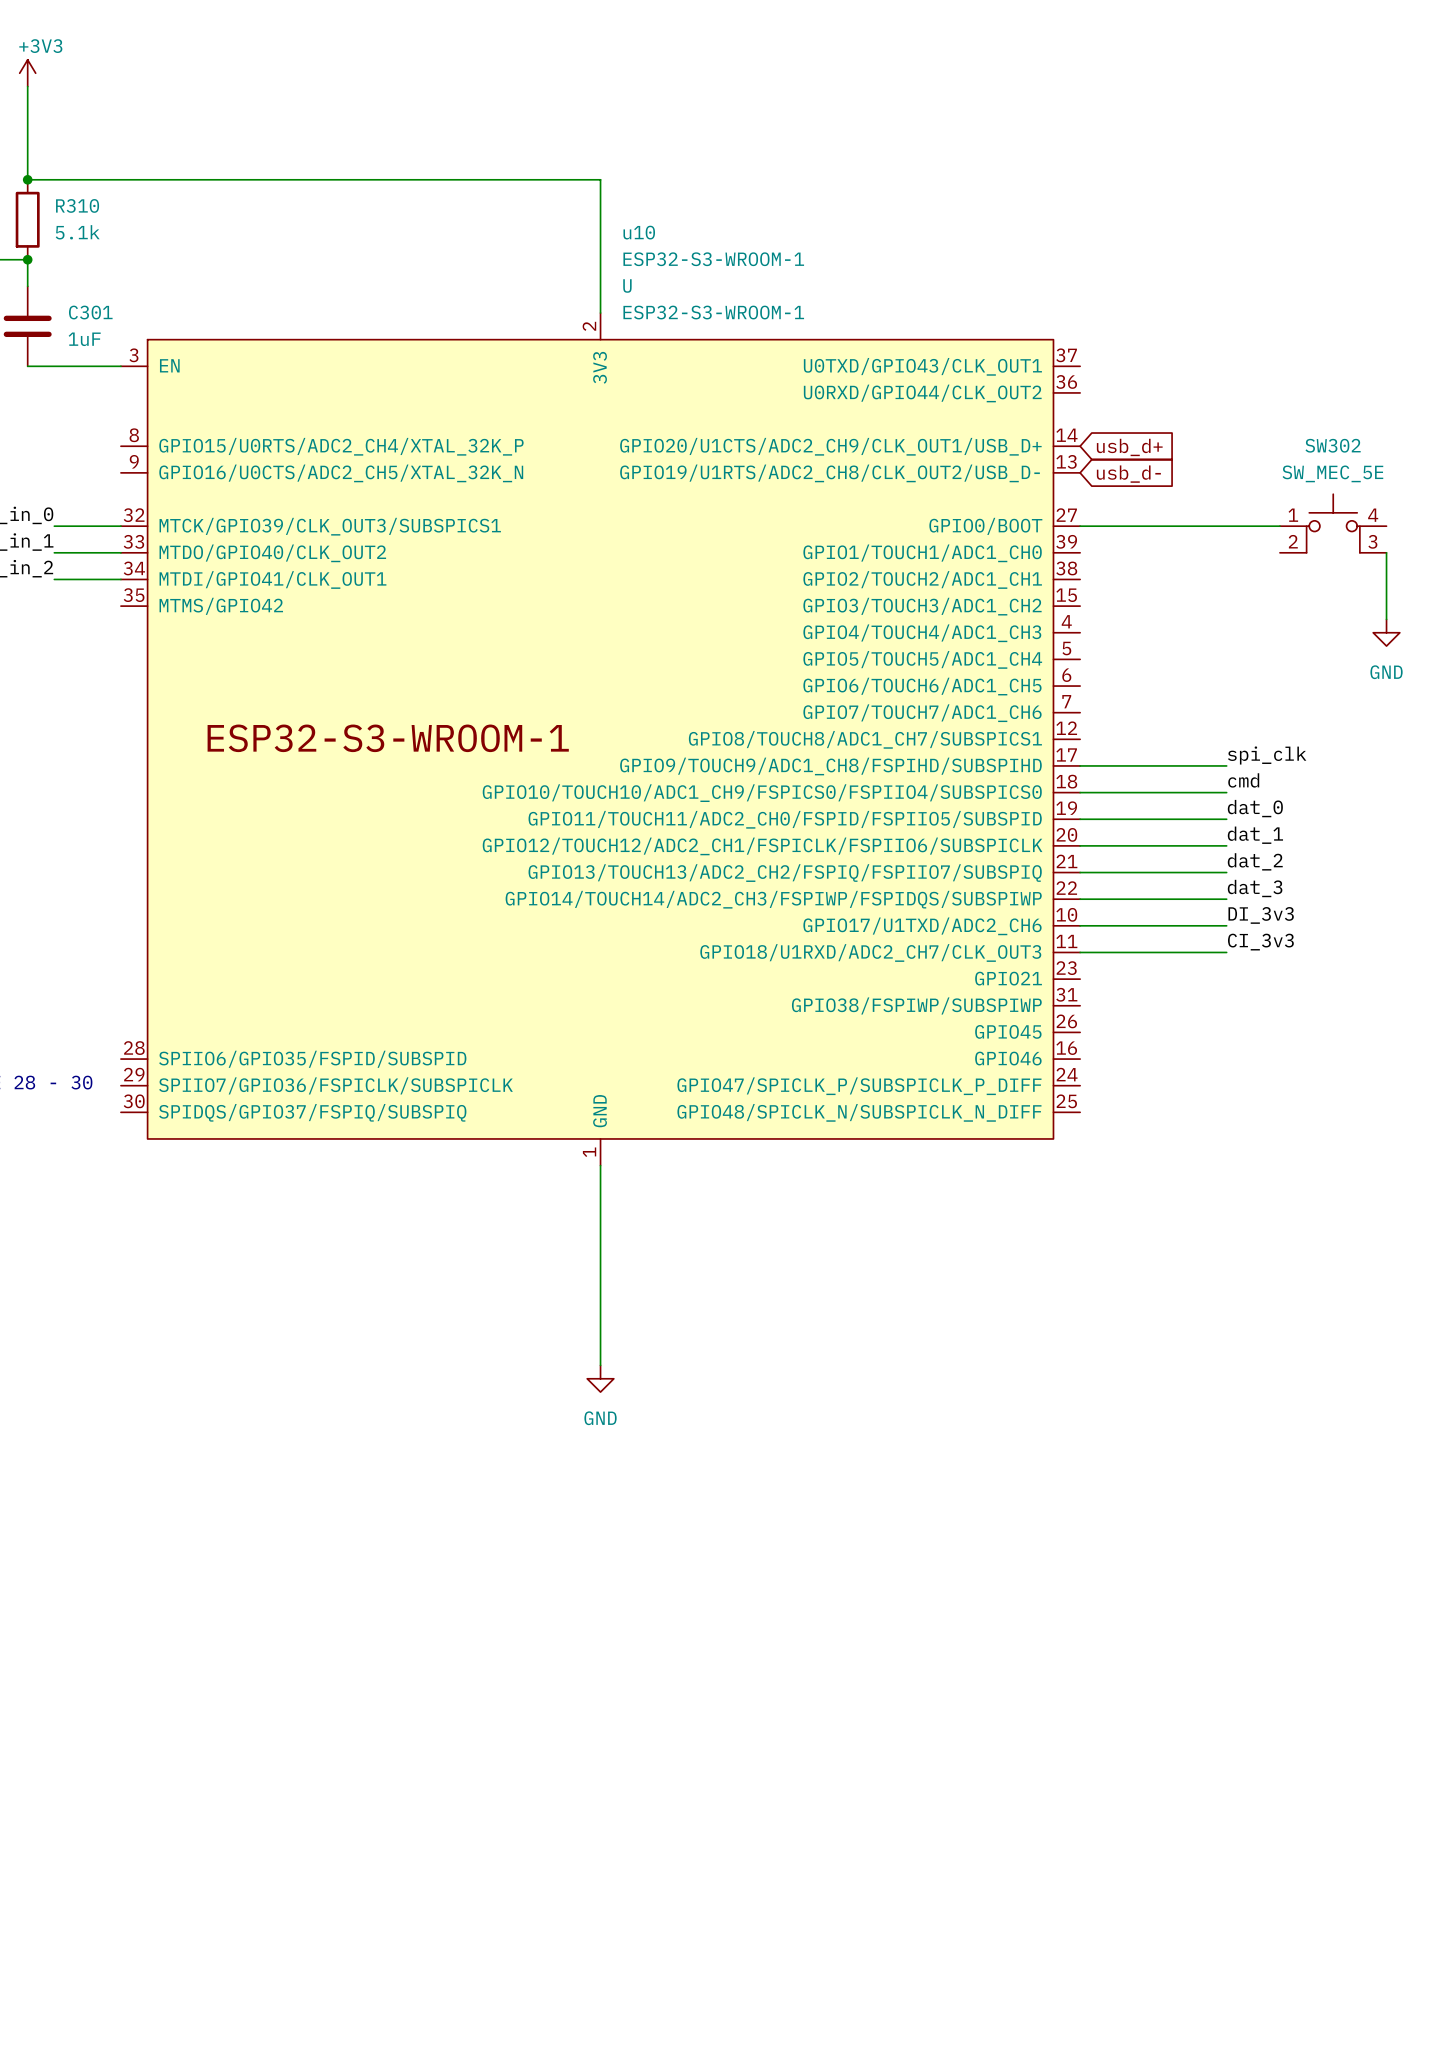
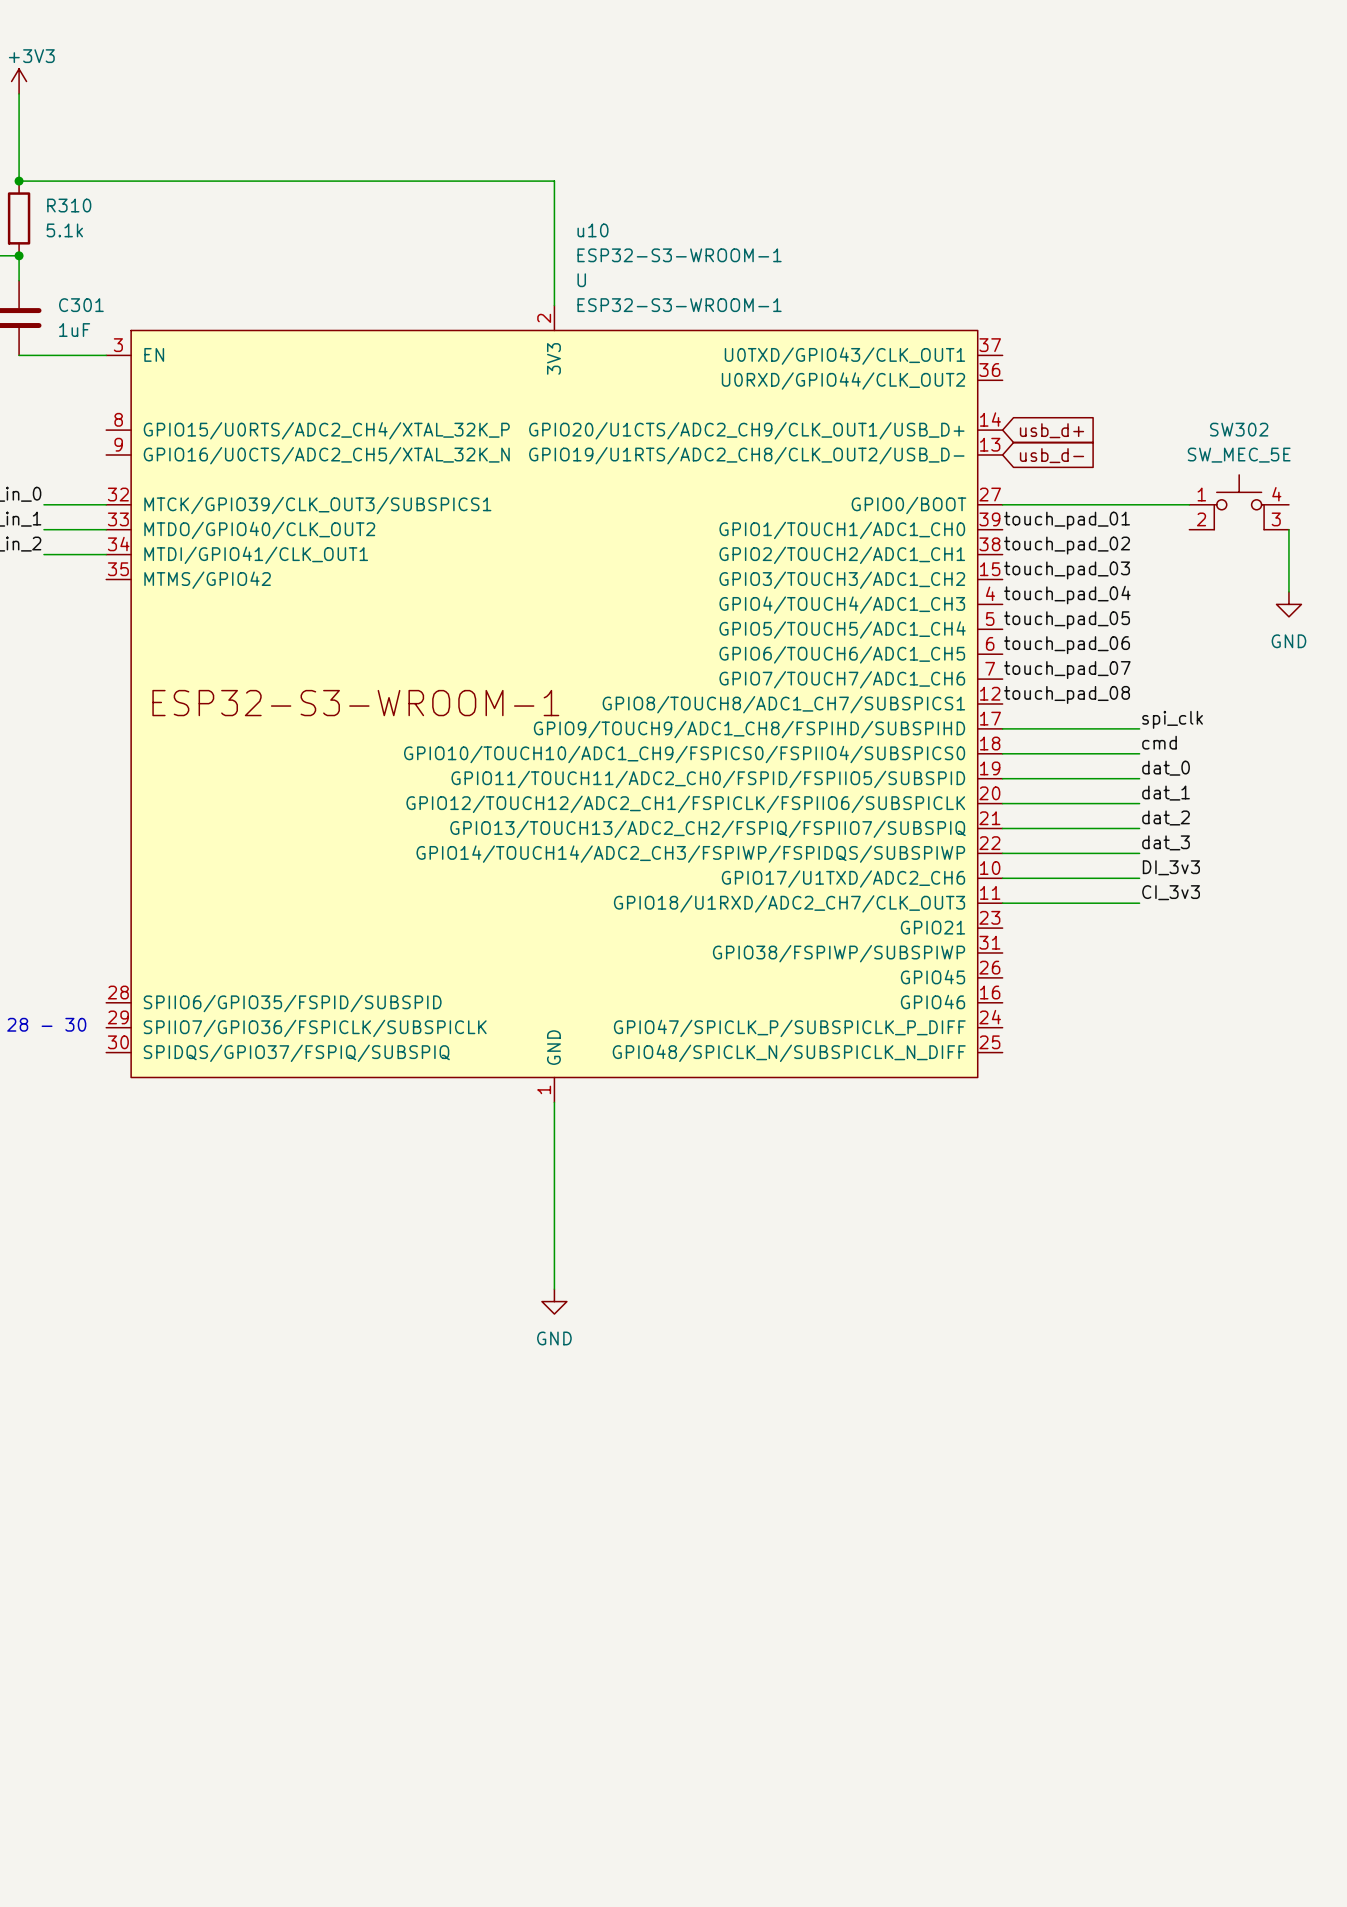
label: none -> touch_pad_01 (1067, 520)
label: none -> touch_pad_02 (1067, 545)
label: none -> touch_pad_03 (1067, 570)
label: none -> touch_pad_04 (1067, 595)
label: none -> touch_pad_05 (1067, 620)
label: none -> touch_pad_06 (1067, 645)
label: none -> touch_pad_07 (1067, 670)
label: none -> touch_pad_08 (1067, 694)

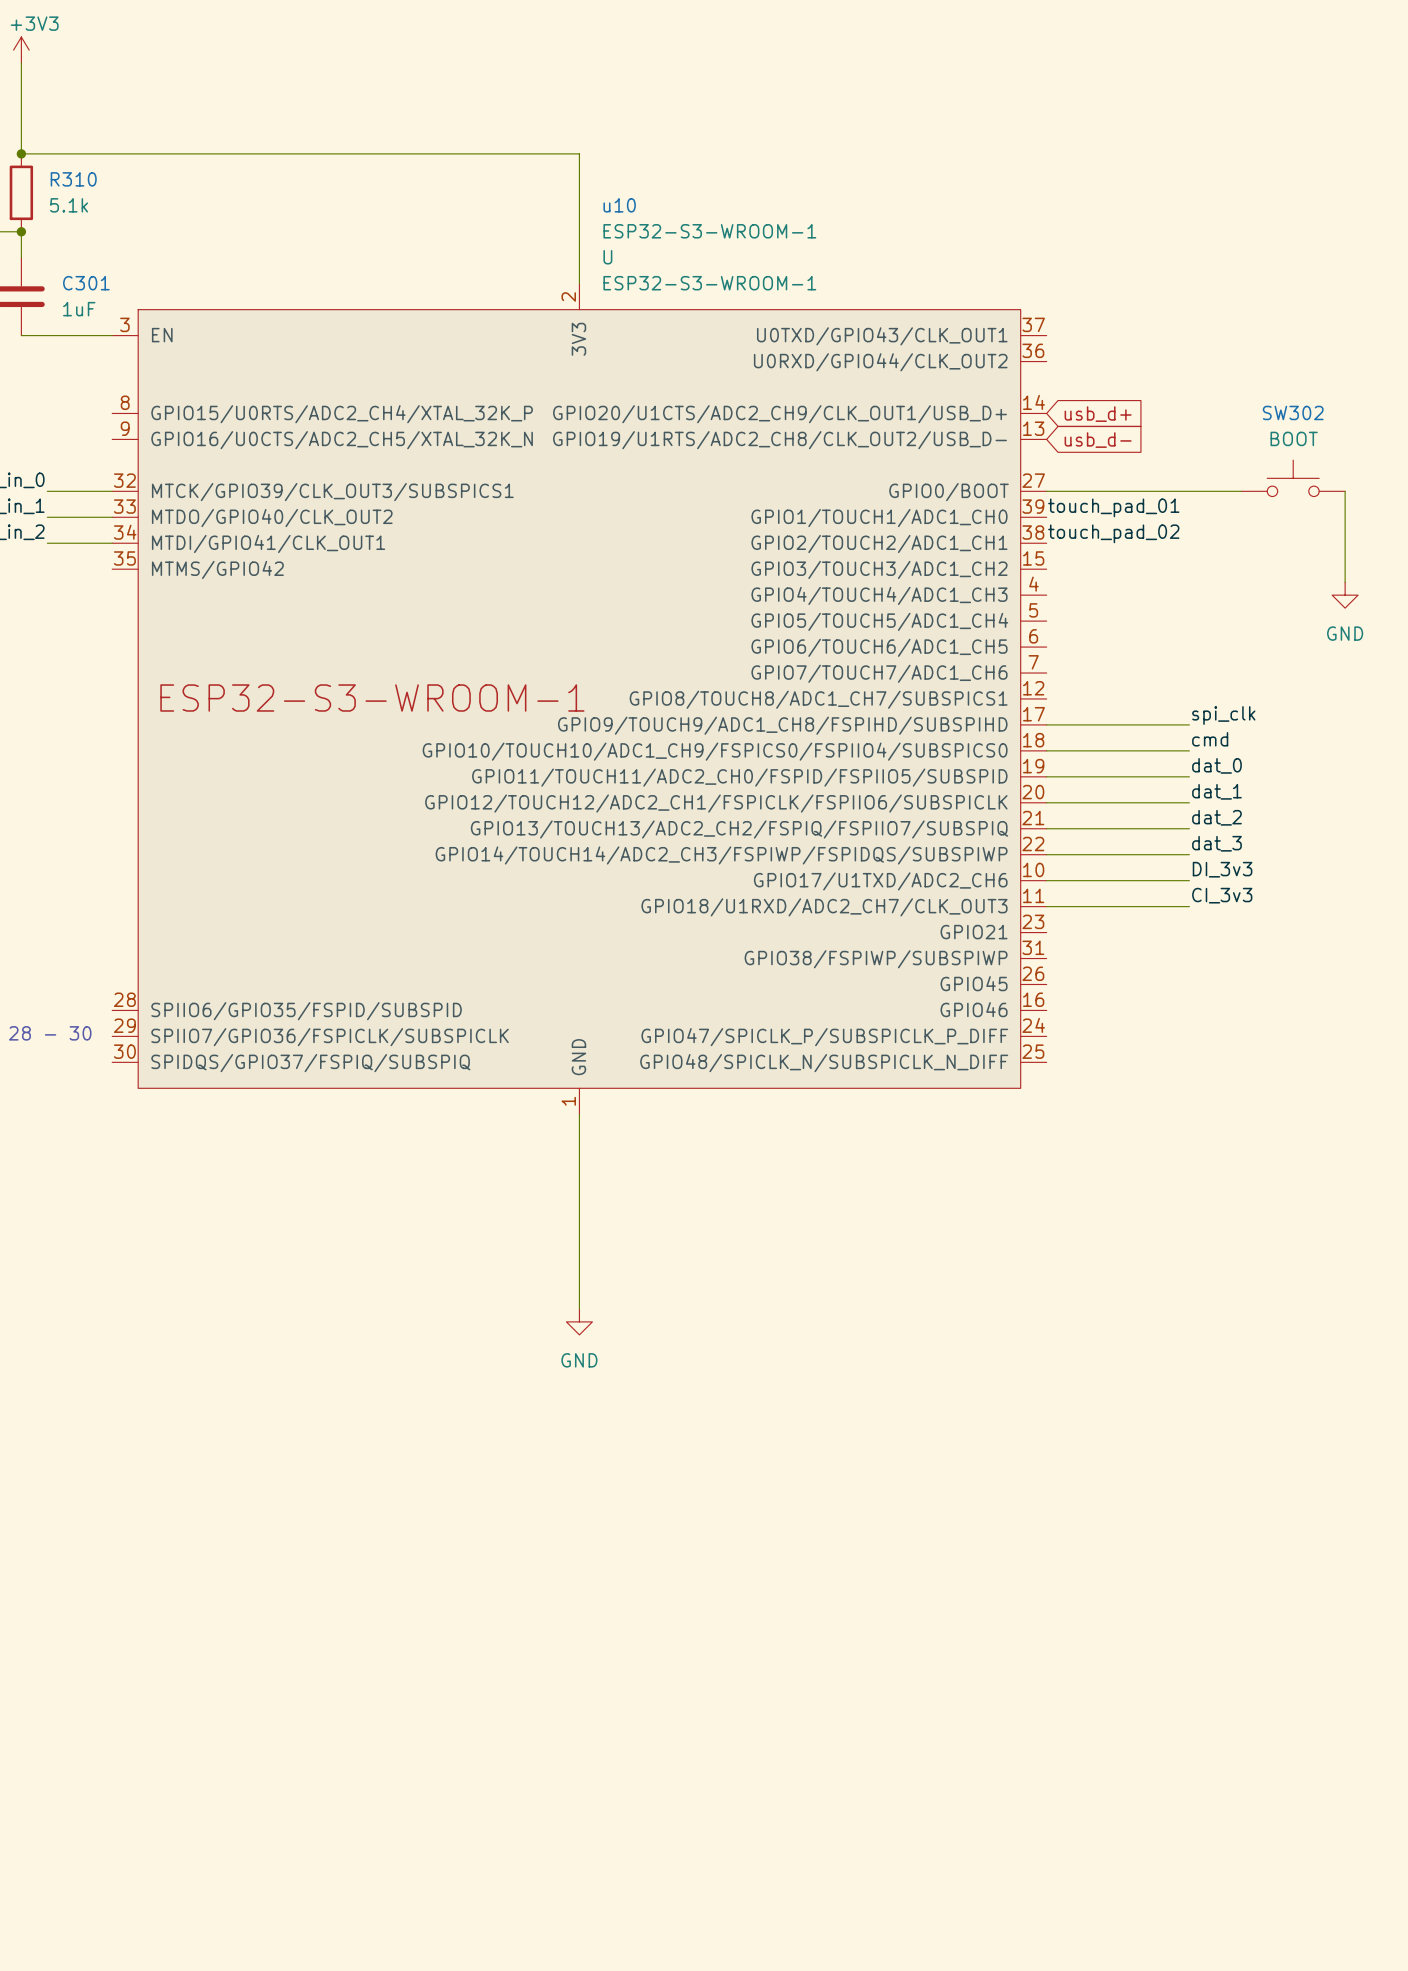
SW302 value: SW_MEC_5E (1239, 455) -> BOOT (1294, 438)
SW302 symbol: [1189, 474, 1289, 530] -> [1241, 460, 1346, 497]
wire: none -> (1345, 491) (1345, 517)
label: touch_pad_03 (1067, 570) -> none
label: touch_pad_04 (1067, 595) -> none
label: touch_pad_05 (1067, 620) -> none
label: touch_pad_06 (1067, 645) -> none
label: touch_pad_07 (1067, 670) -> none
label: touch_pad_08 (1067, 694) -> none

